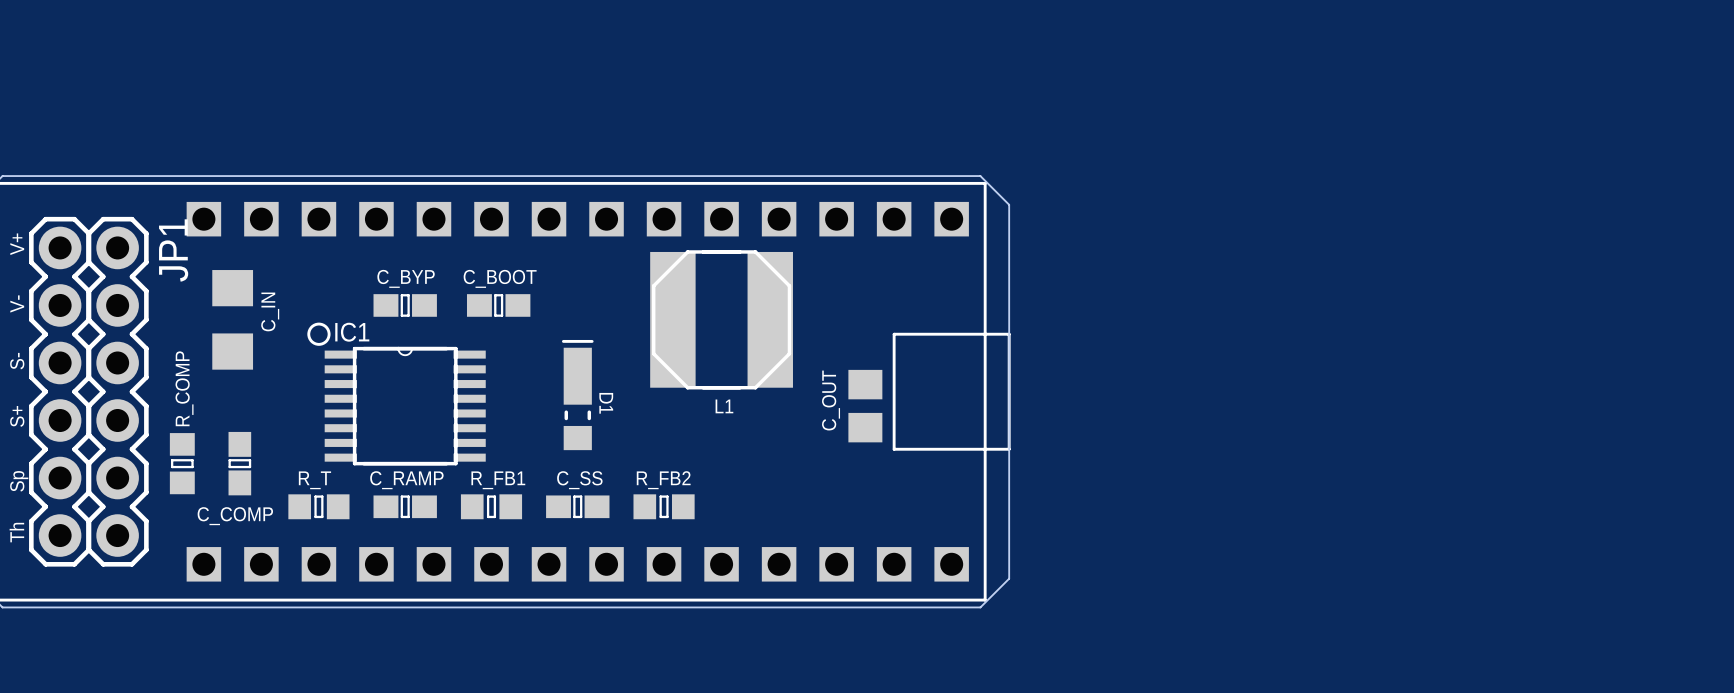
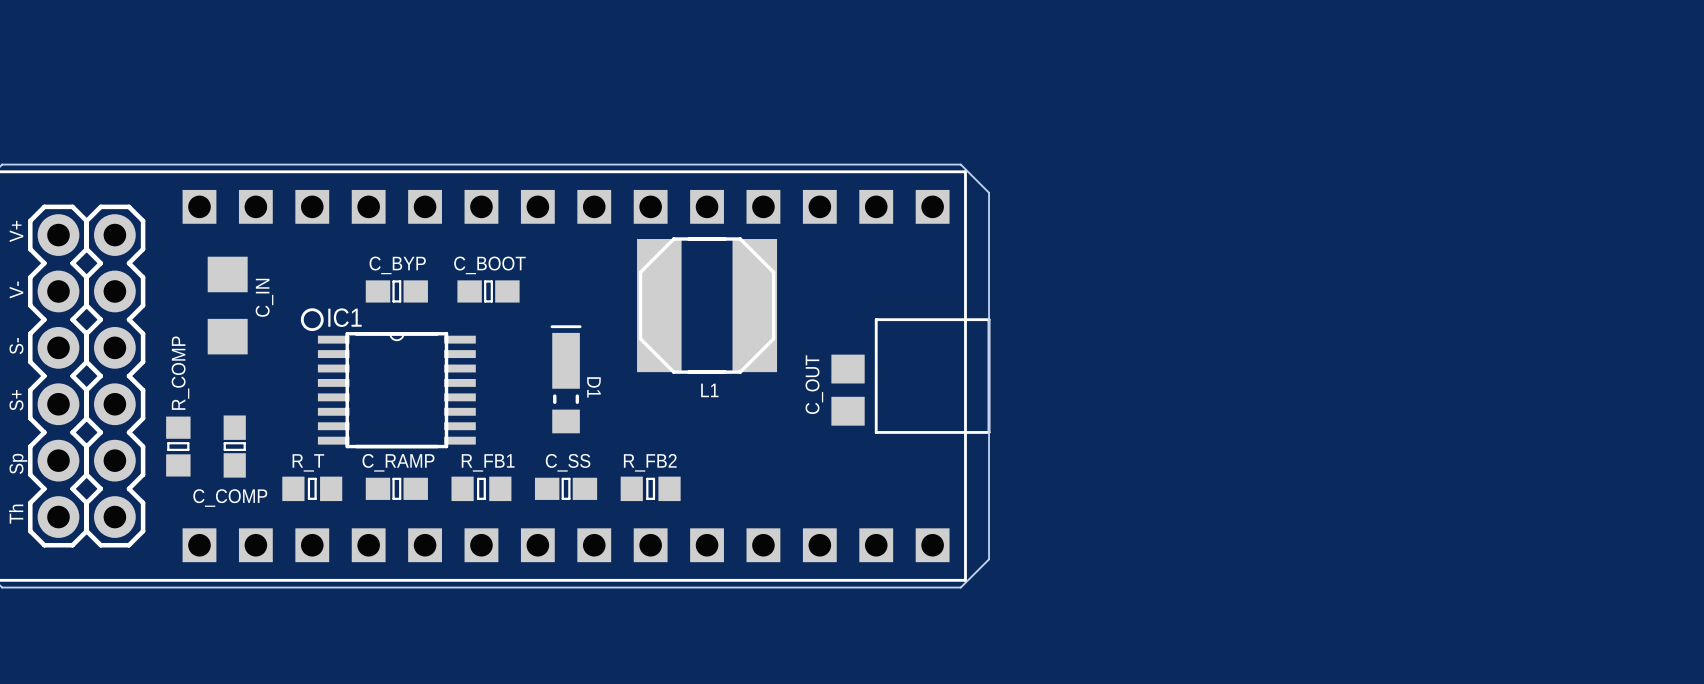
JP1 name: JP1 (173, 250) -> none

